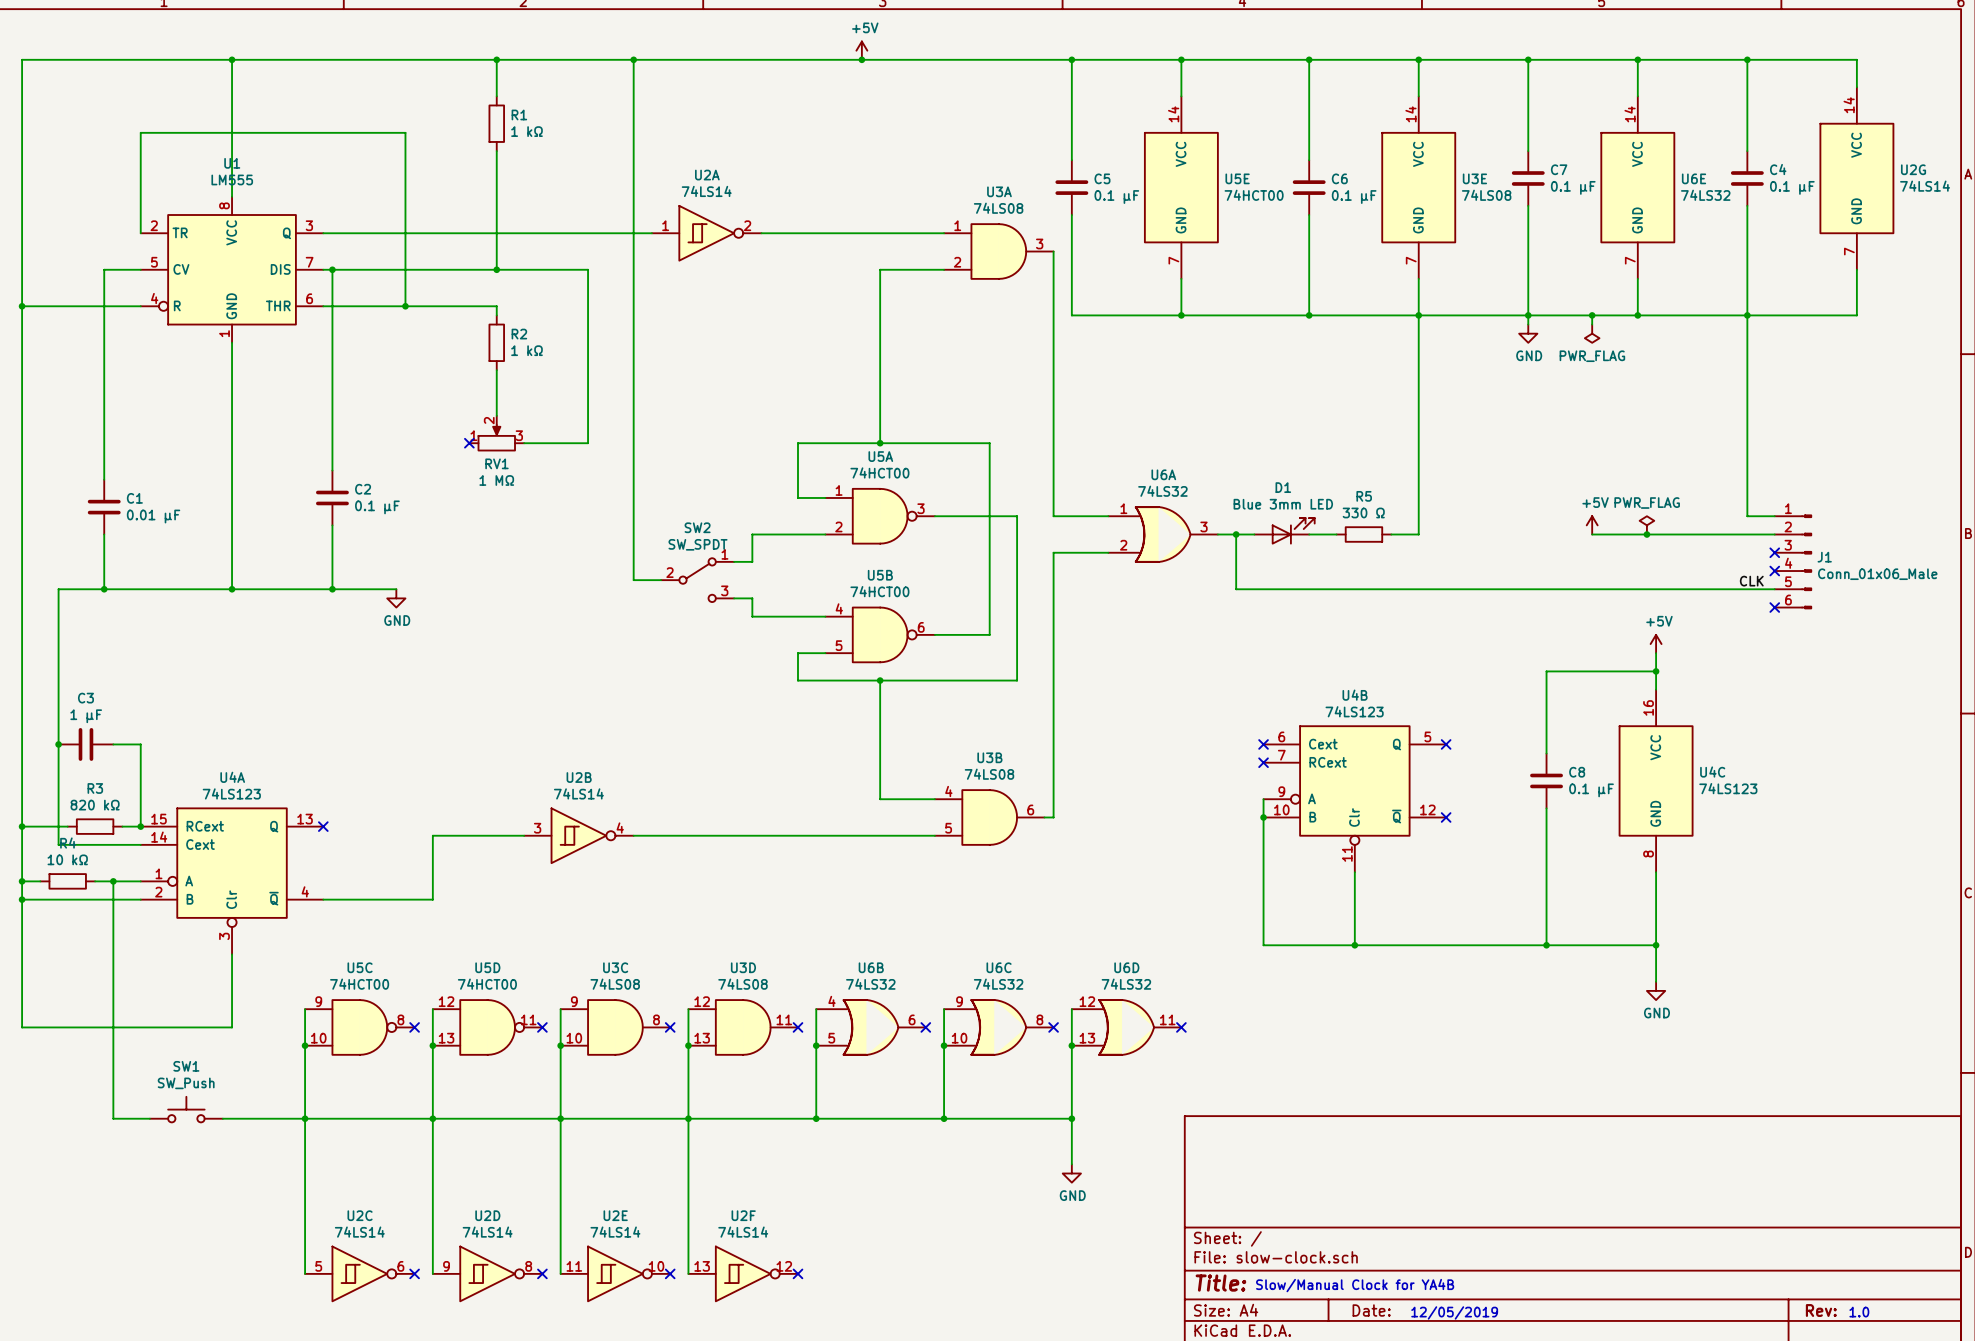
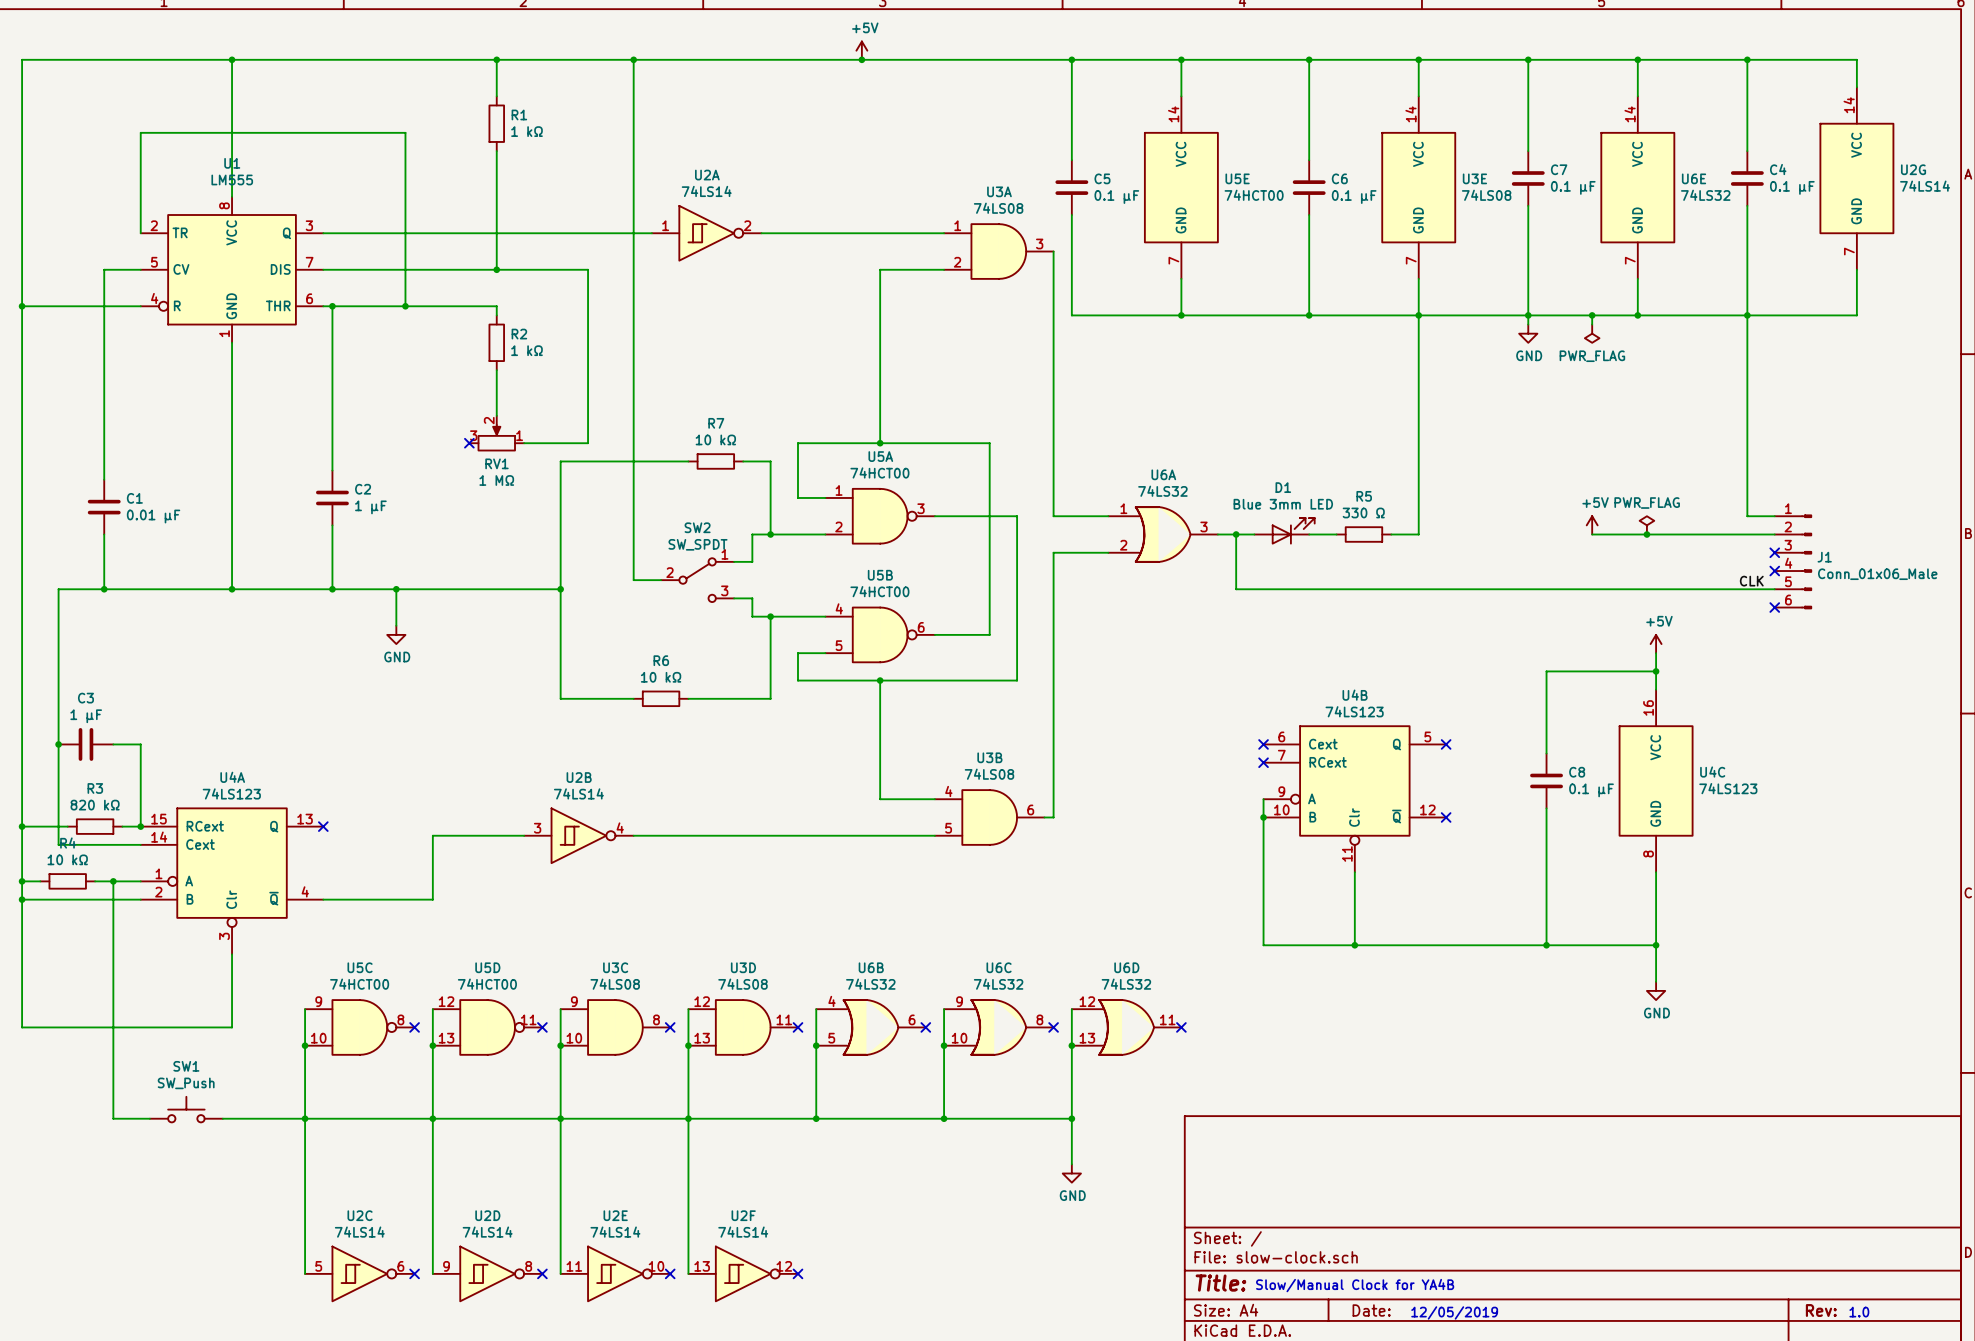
wire: (332, 269) (332, 306) -> none
junction position: (332, 269) -> (332, 306)
RV1 flip: as is (496, 438) -> left-right (496, 438)
wire: none -> (688, 461) (560, 461) (560, 698) (633, 698)
R7: none -> 10 kΩ (715, 461)
wire: none -> (743, 461) (770, 461) (770, 534)
C2 value: 0.1 µF (377, 507) -> 1 µF (370, 507)
junction: none -> (770, 534)
junction: none -> (396, 589)
wire: none -> (560, 589) (396, 589) (396, 625)
junction: none -> (560, 589)
power symbol position: GND (396, 598) -> GND (396, 634)
wire: none -> (770, 616) (770, 698) (688, 698)
junction: none -> (770, 616)
R6: none -> 10 kΩ (661, 698)

